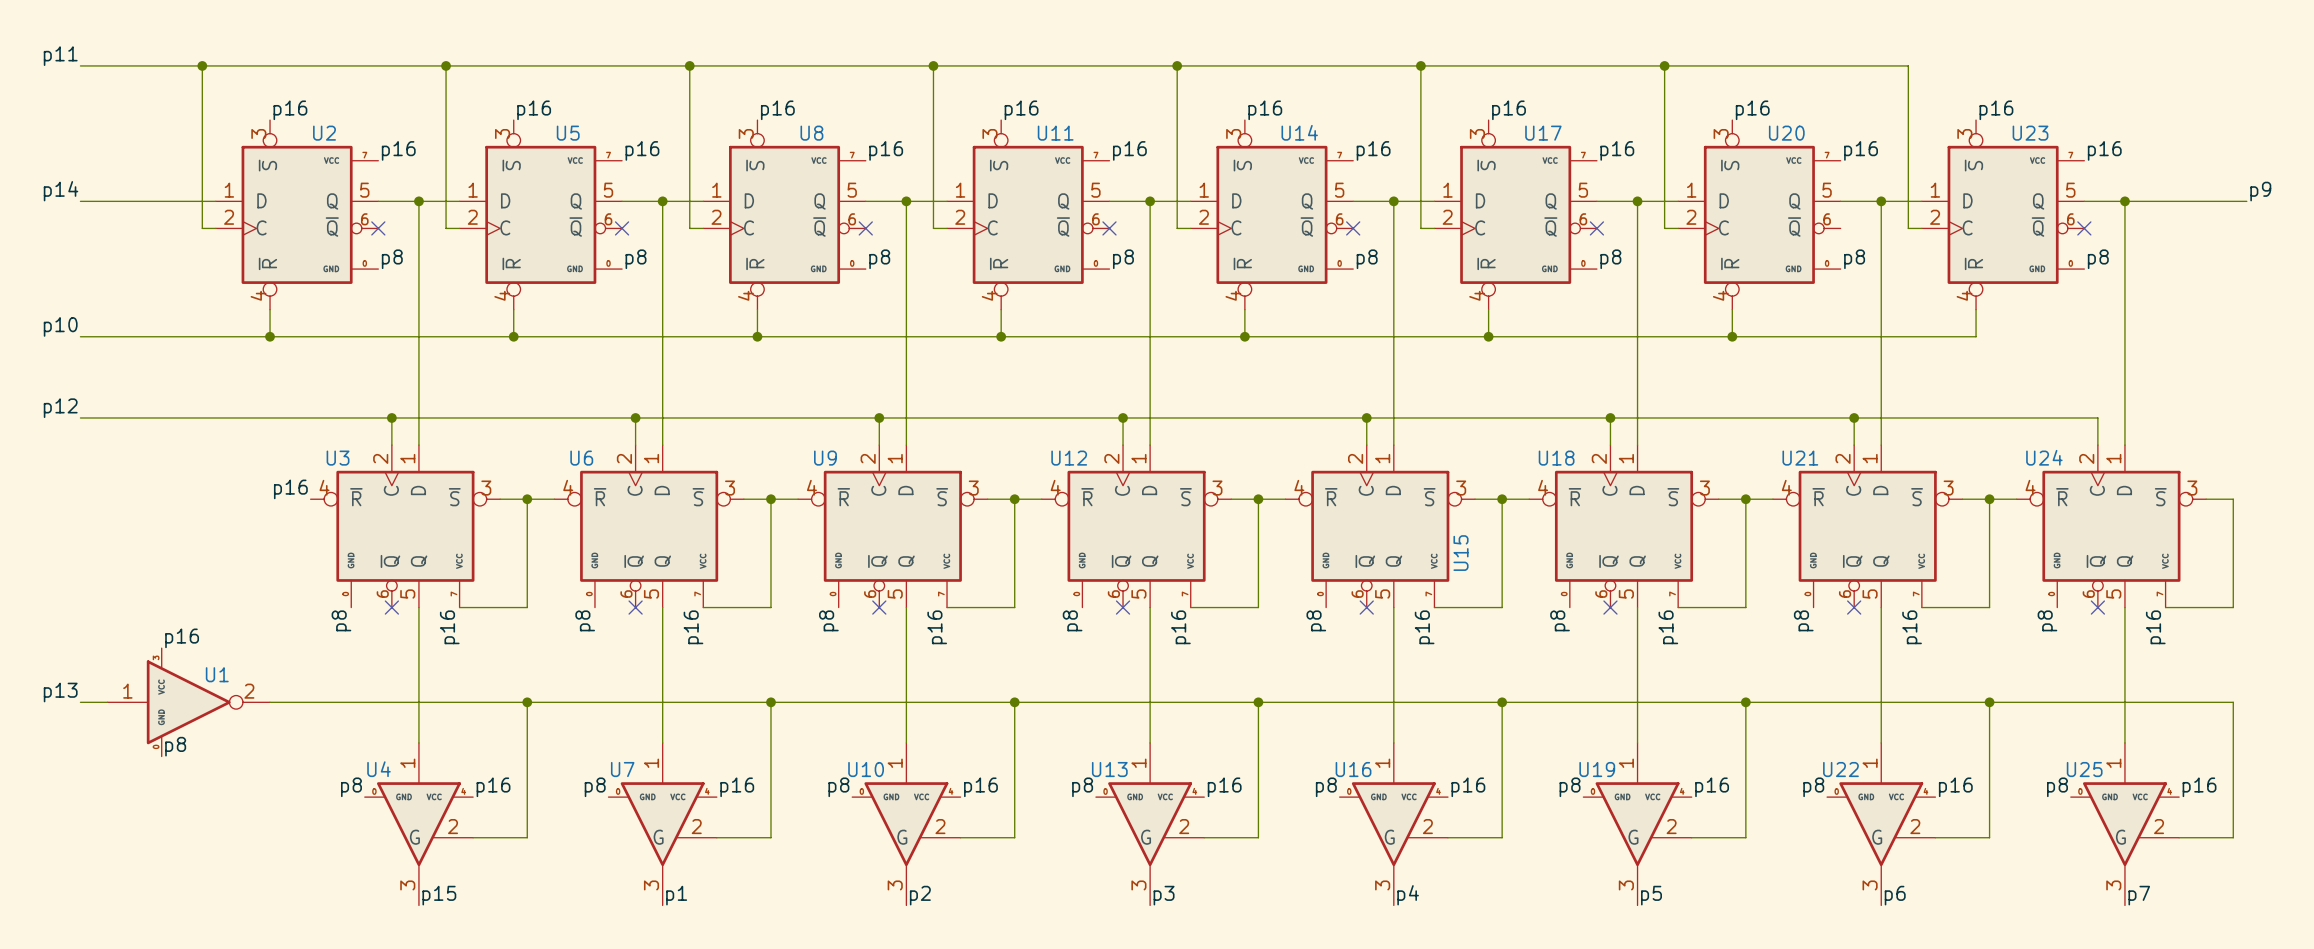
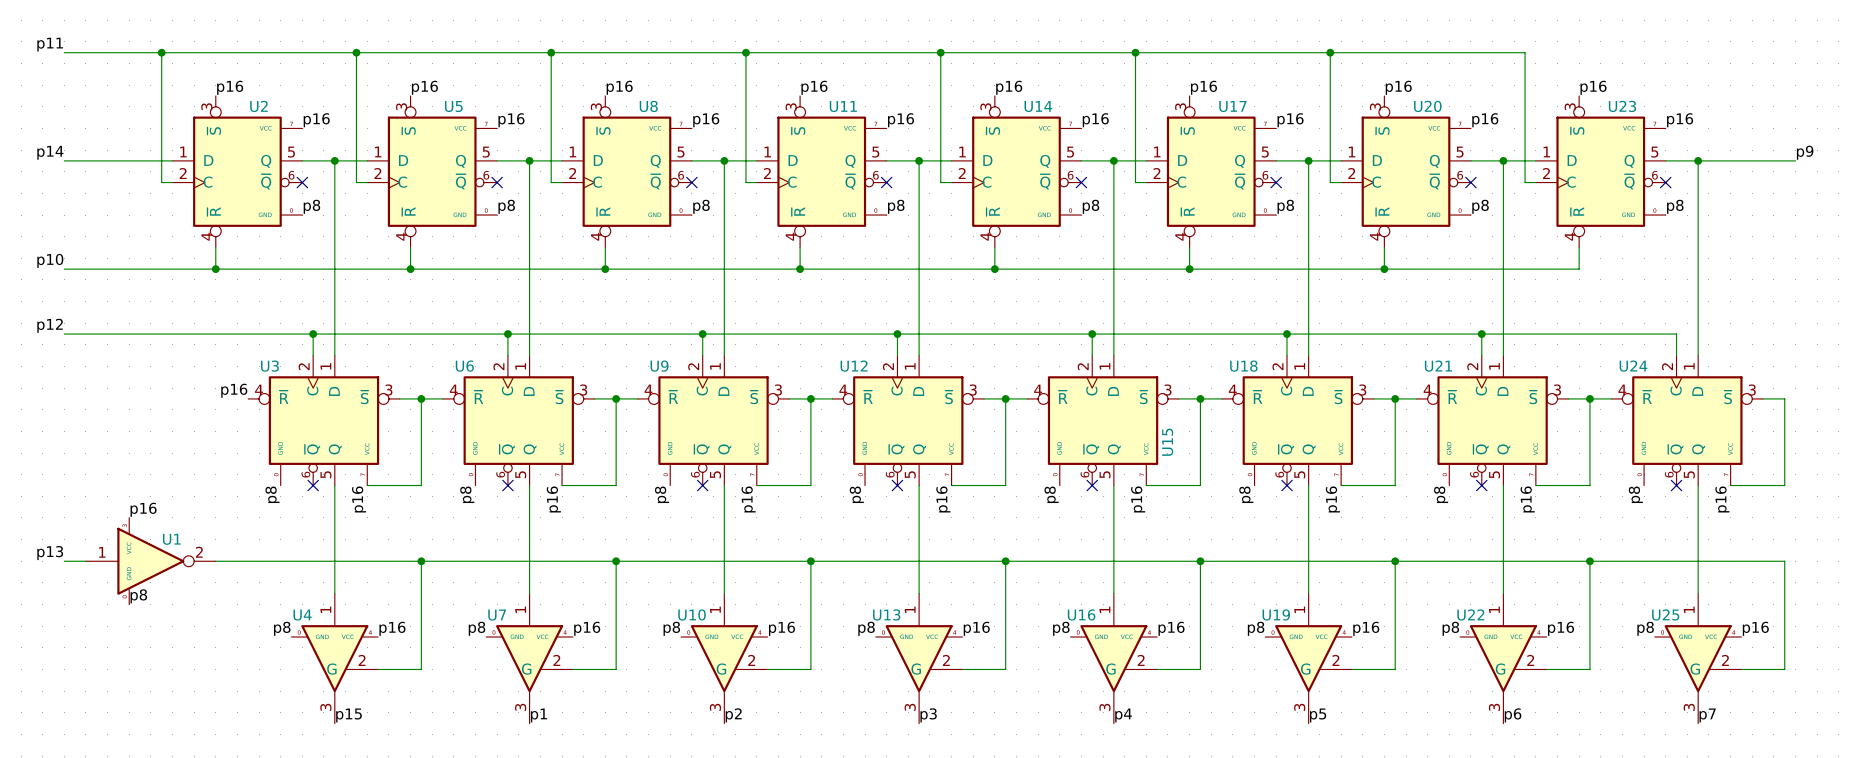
no-connect mark: none -> (1470, 182)

